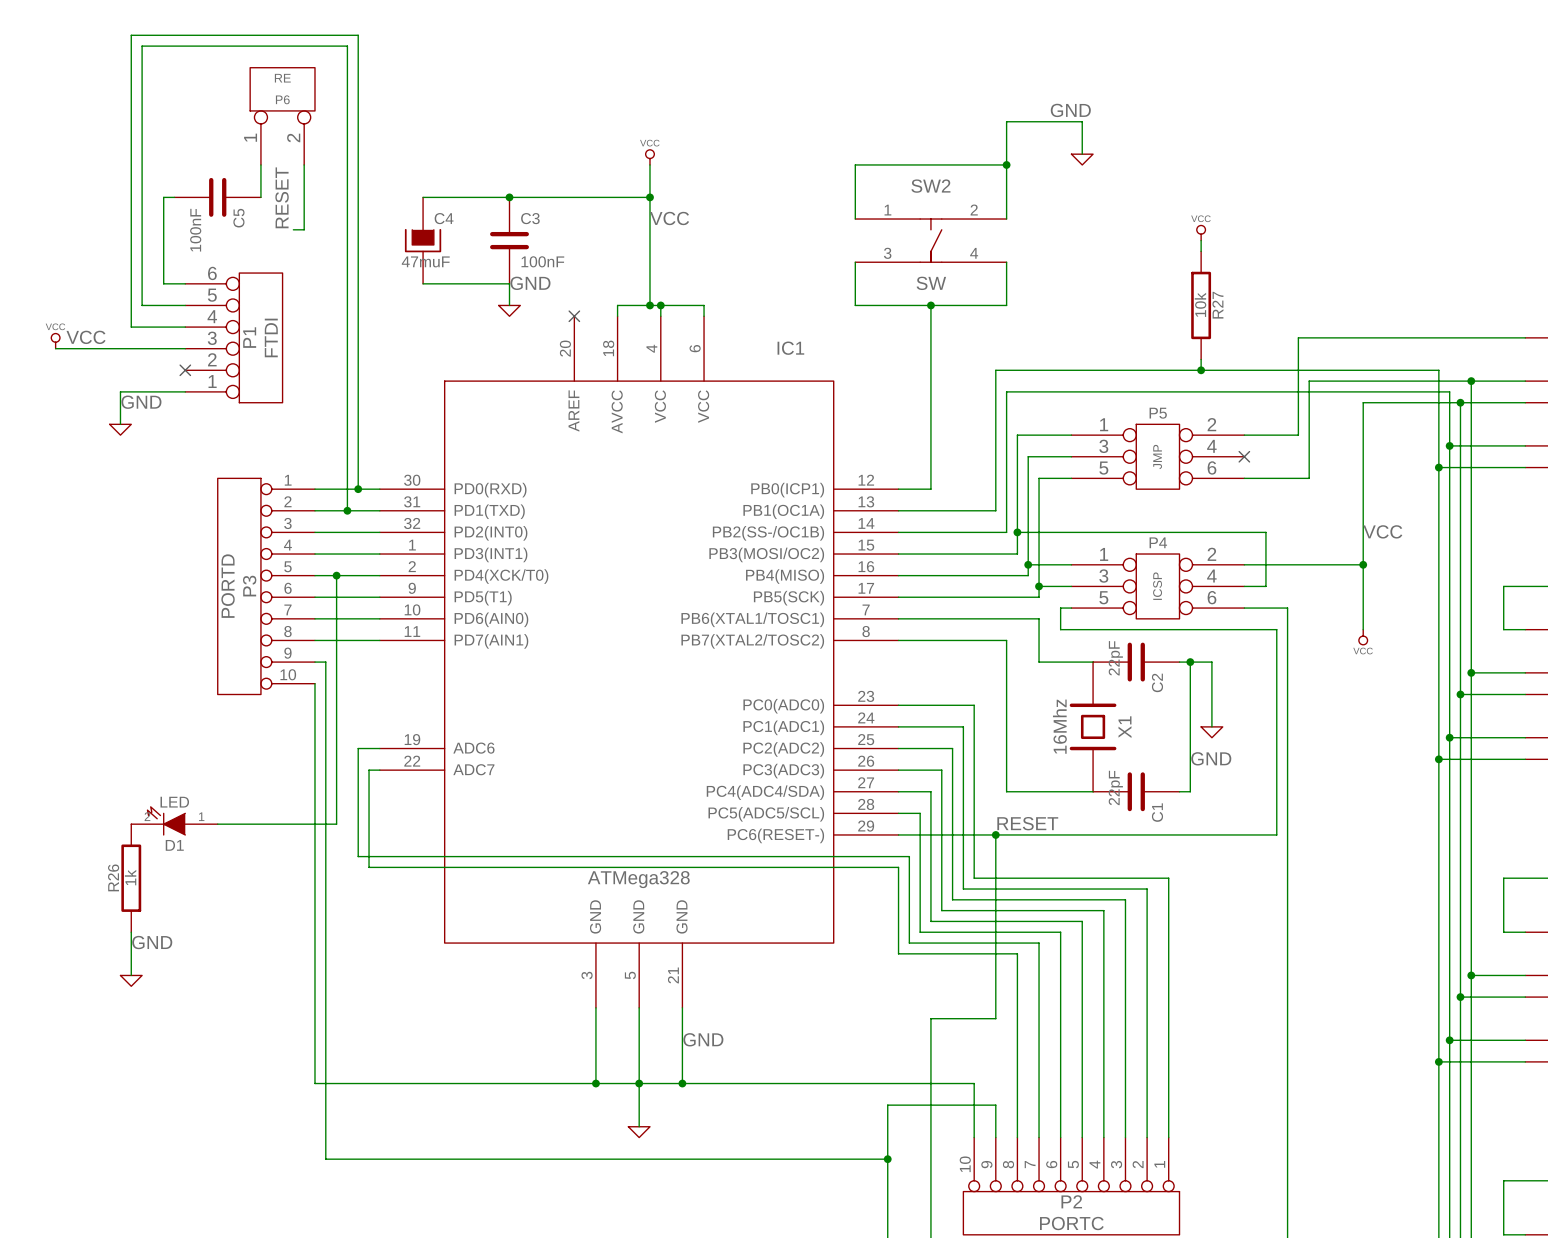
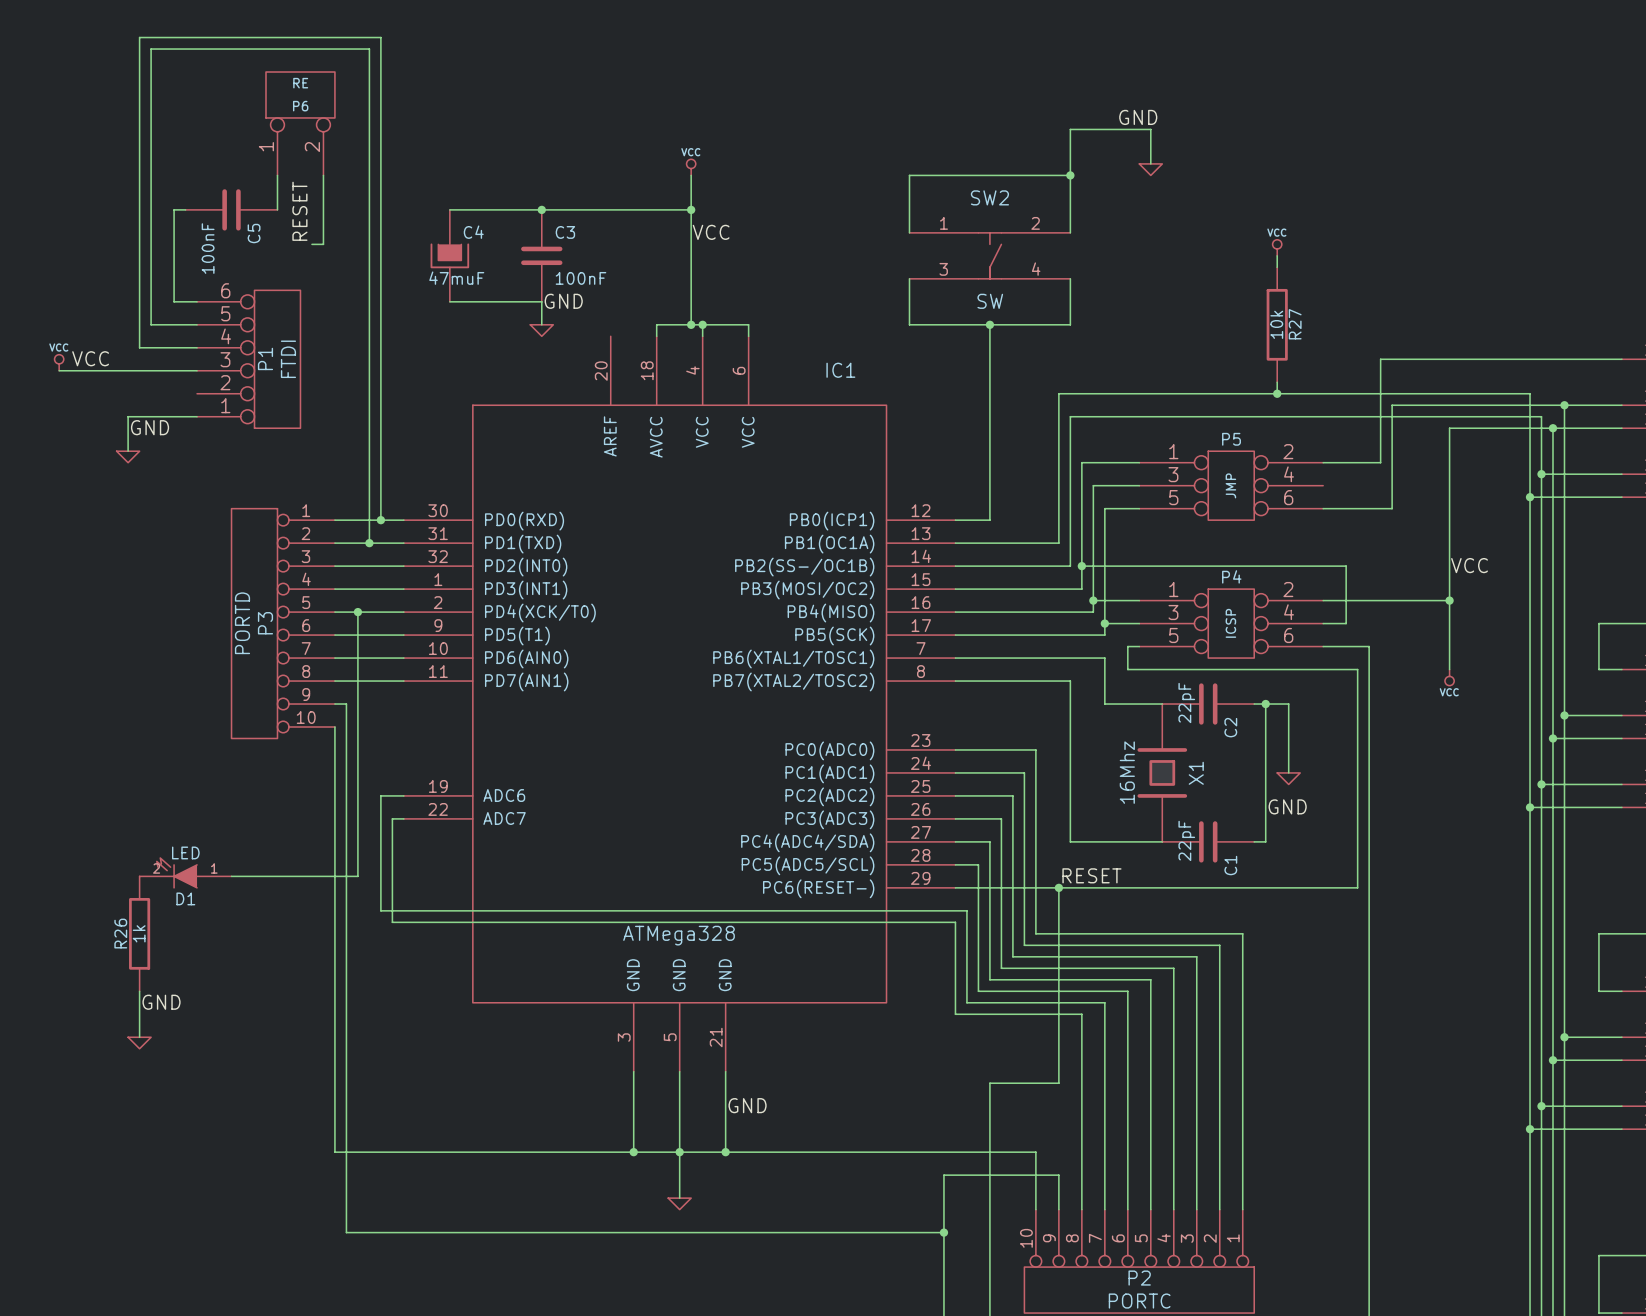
no-connect mark: (574, 316) -> none
no-connect mark: (185, 370) -> none
no-connect mark: (1244, 456) -> none

